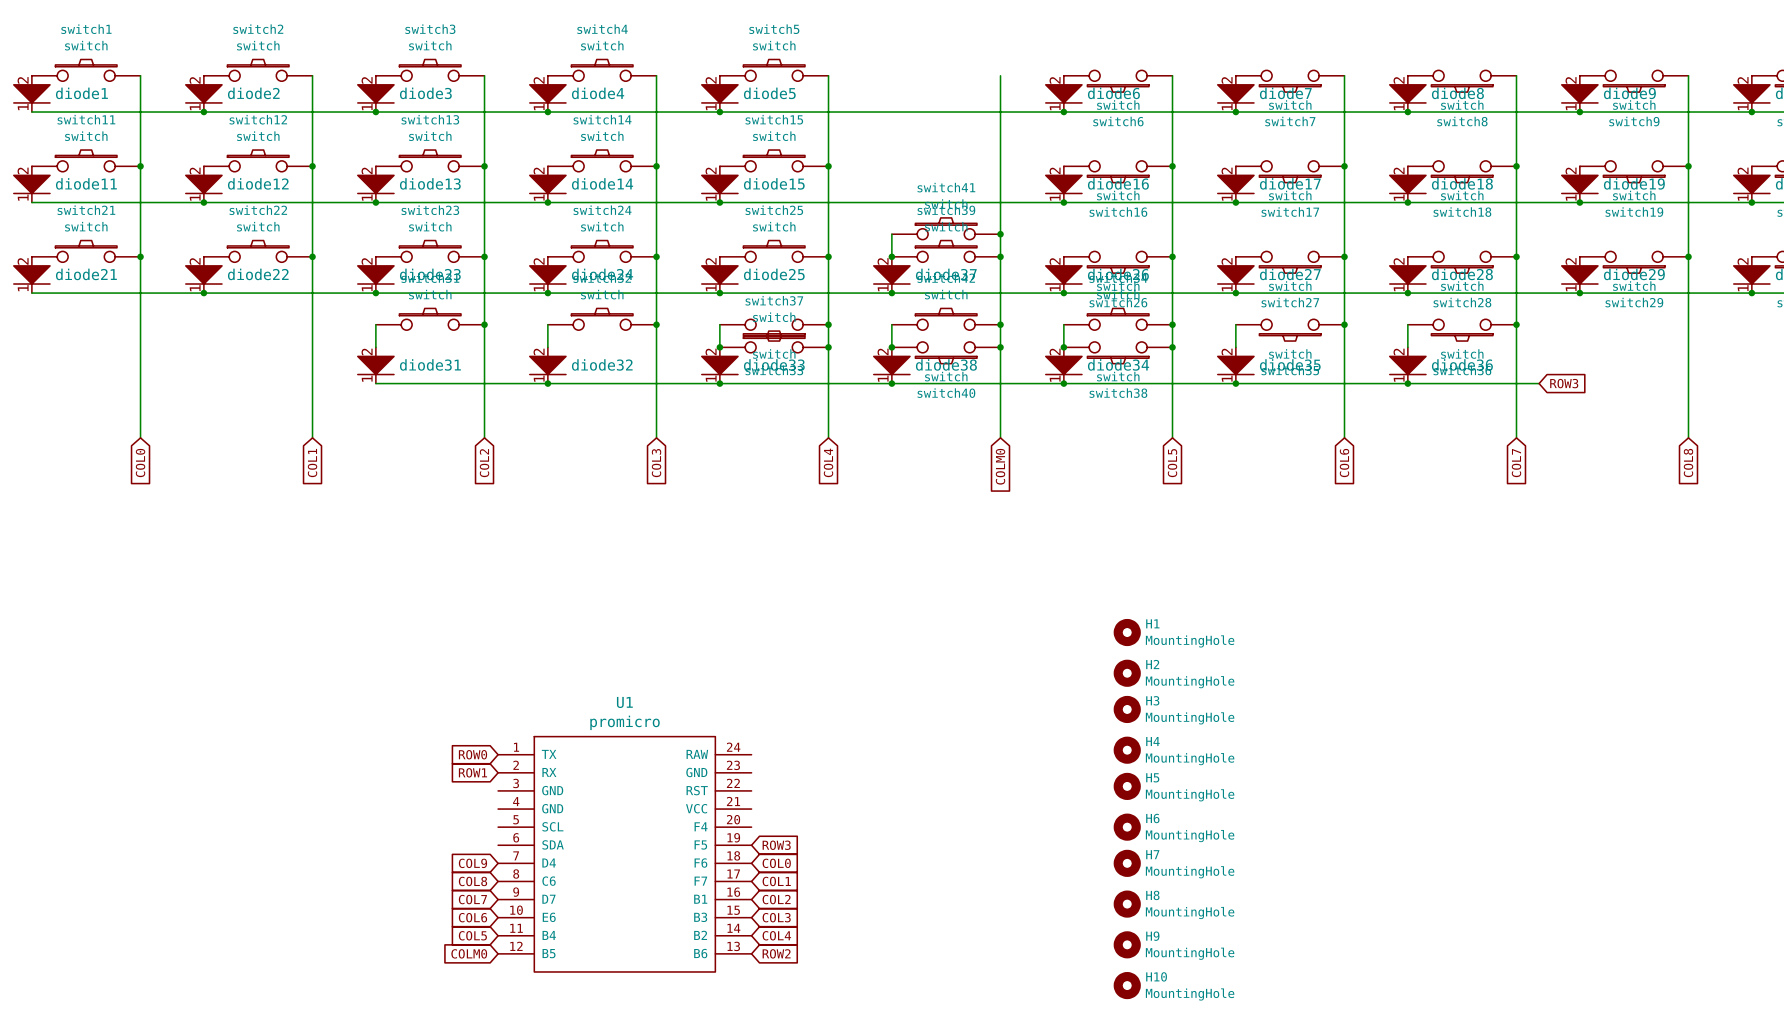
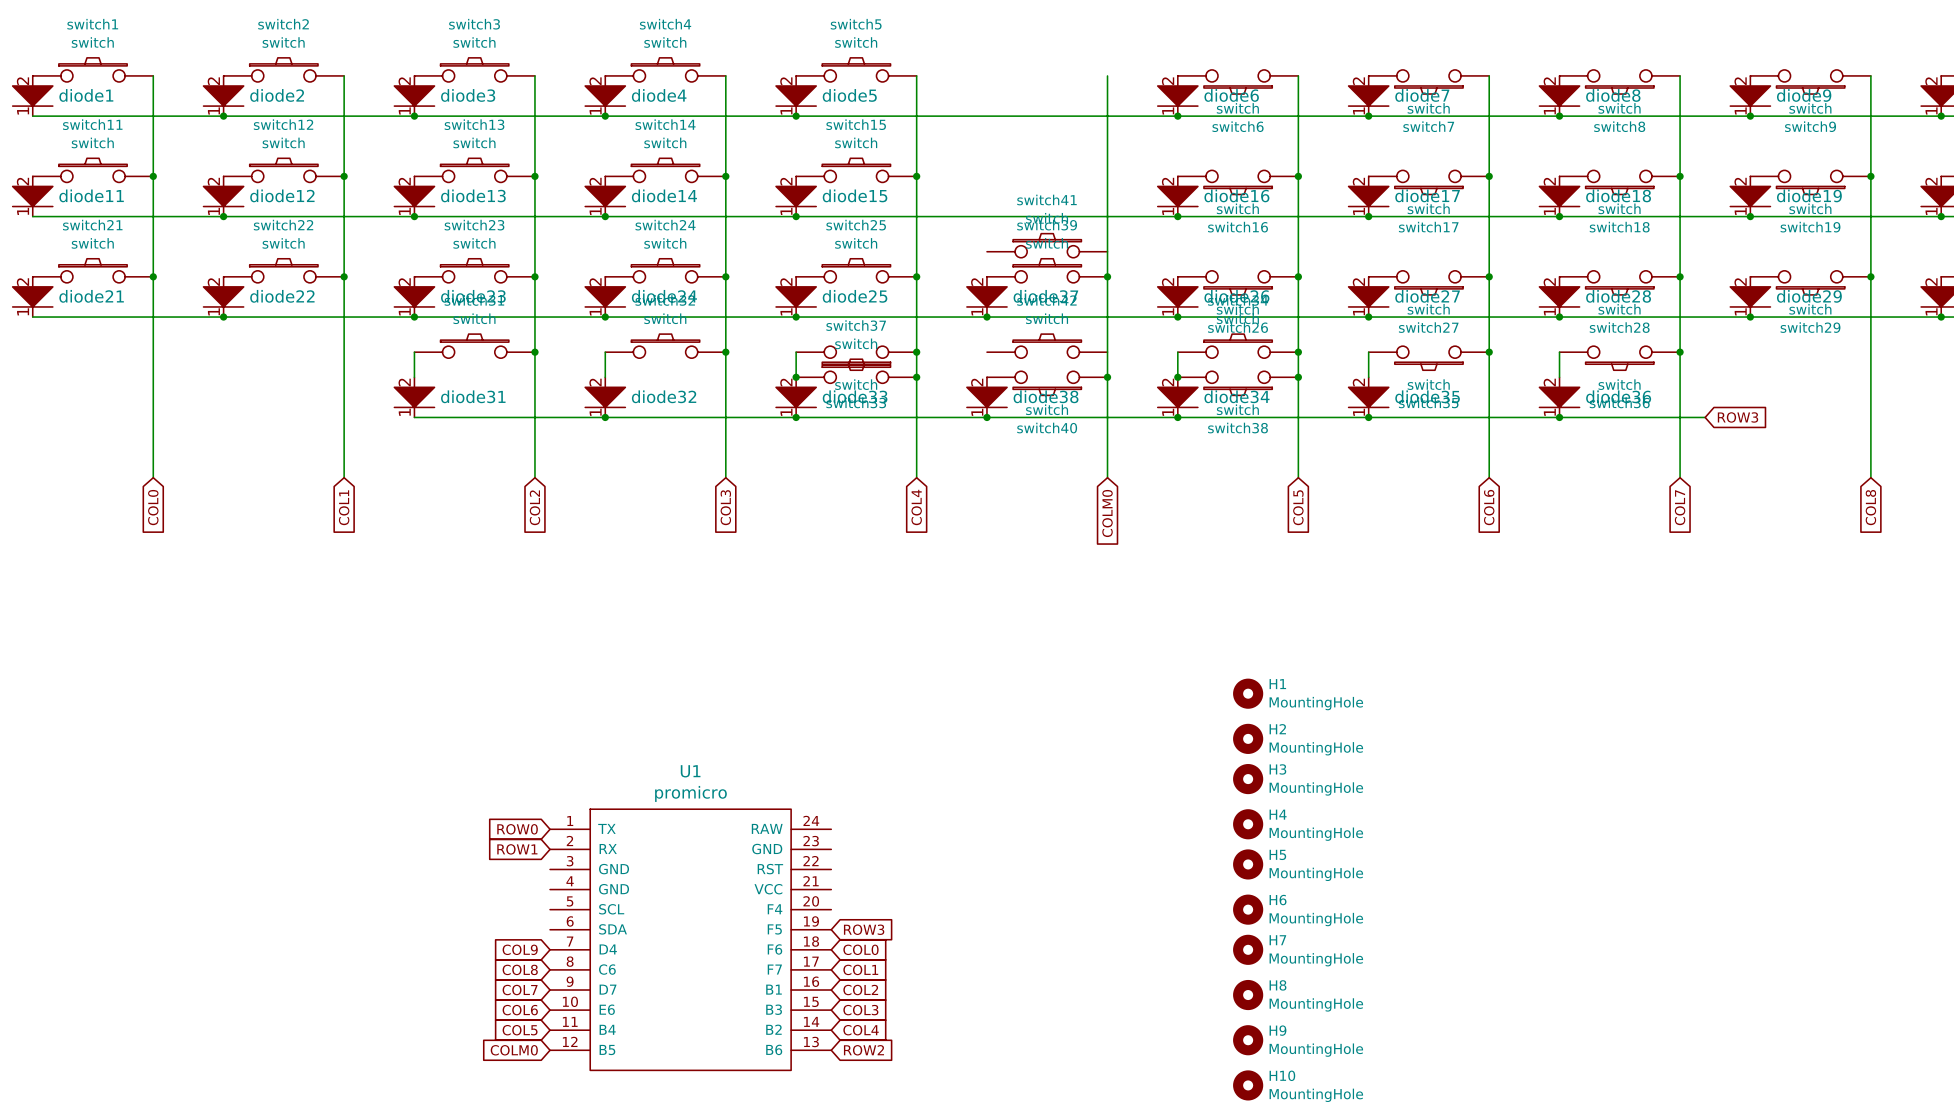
wire: (891, 234) (891, 256) -> none
junction: (1000, 234) -> none
junction: (891, 256) -> none
wire: (891, 324) (891, 347) -> none
junction: (1000, 324) -> none
junction: (891, 347) -> none

